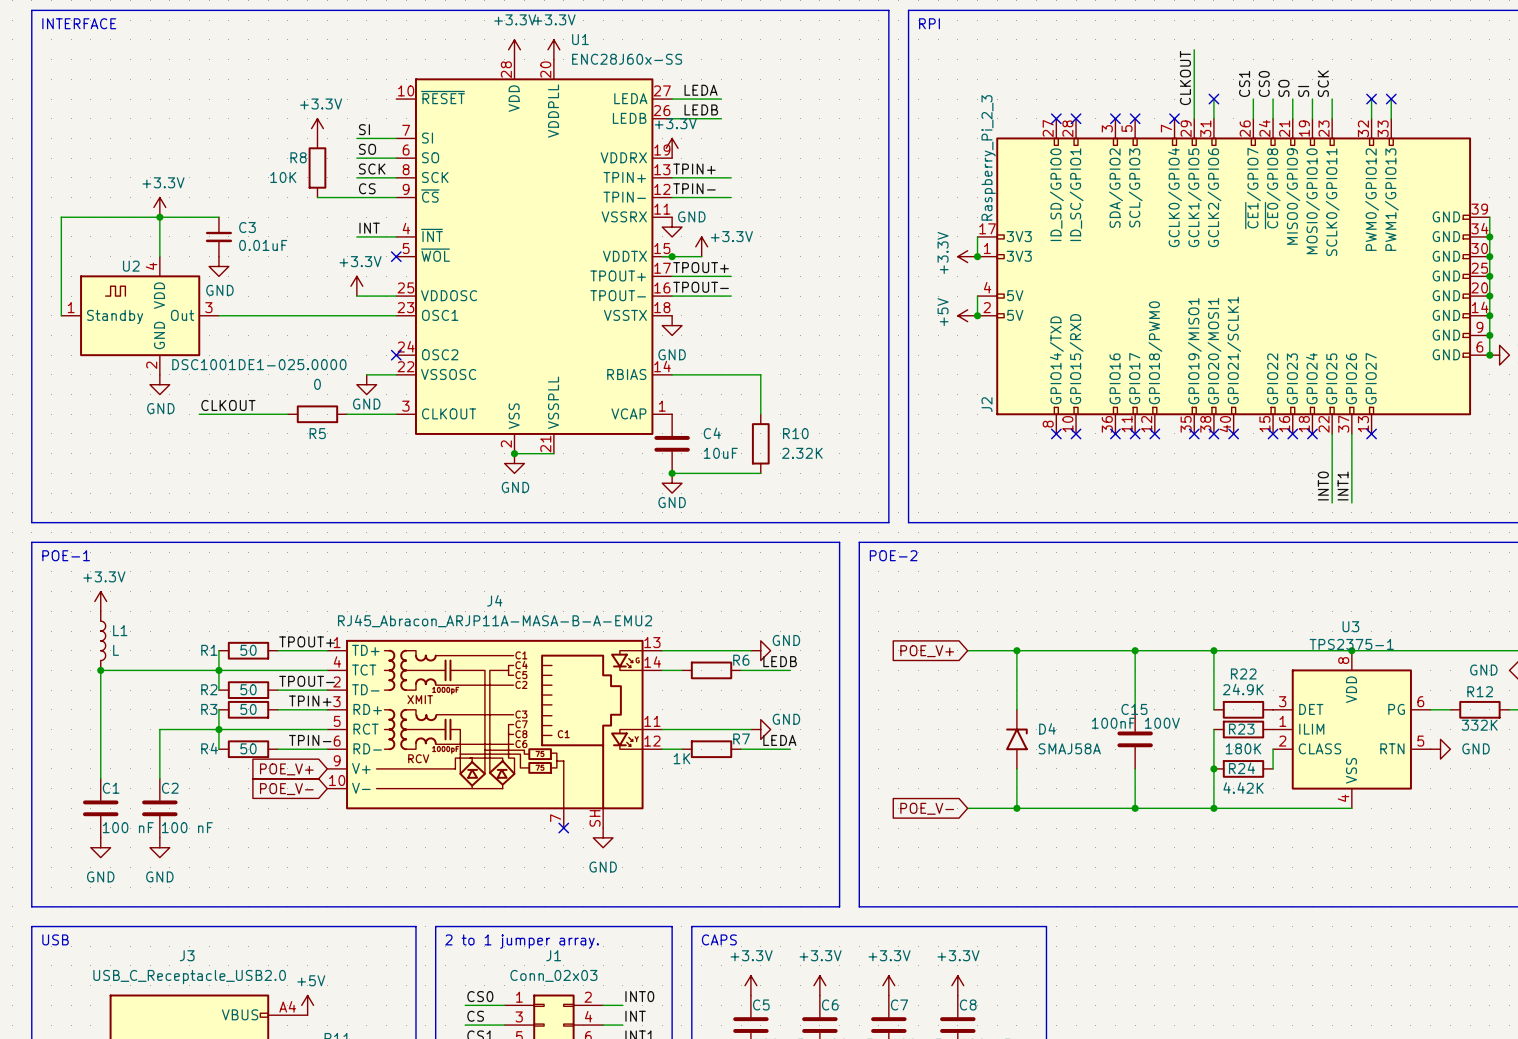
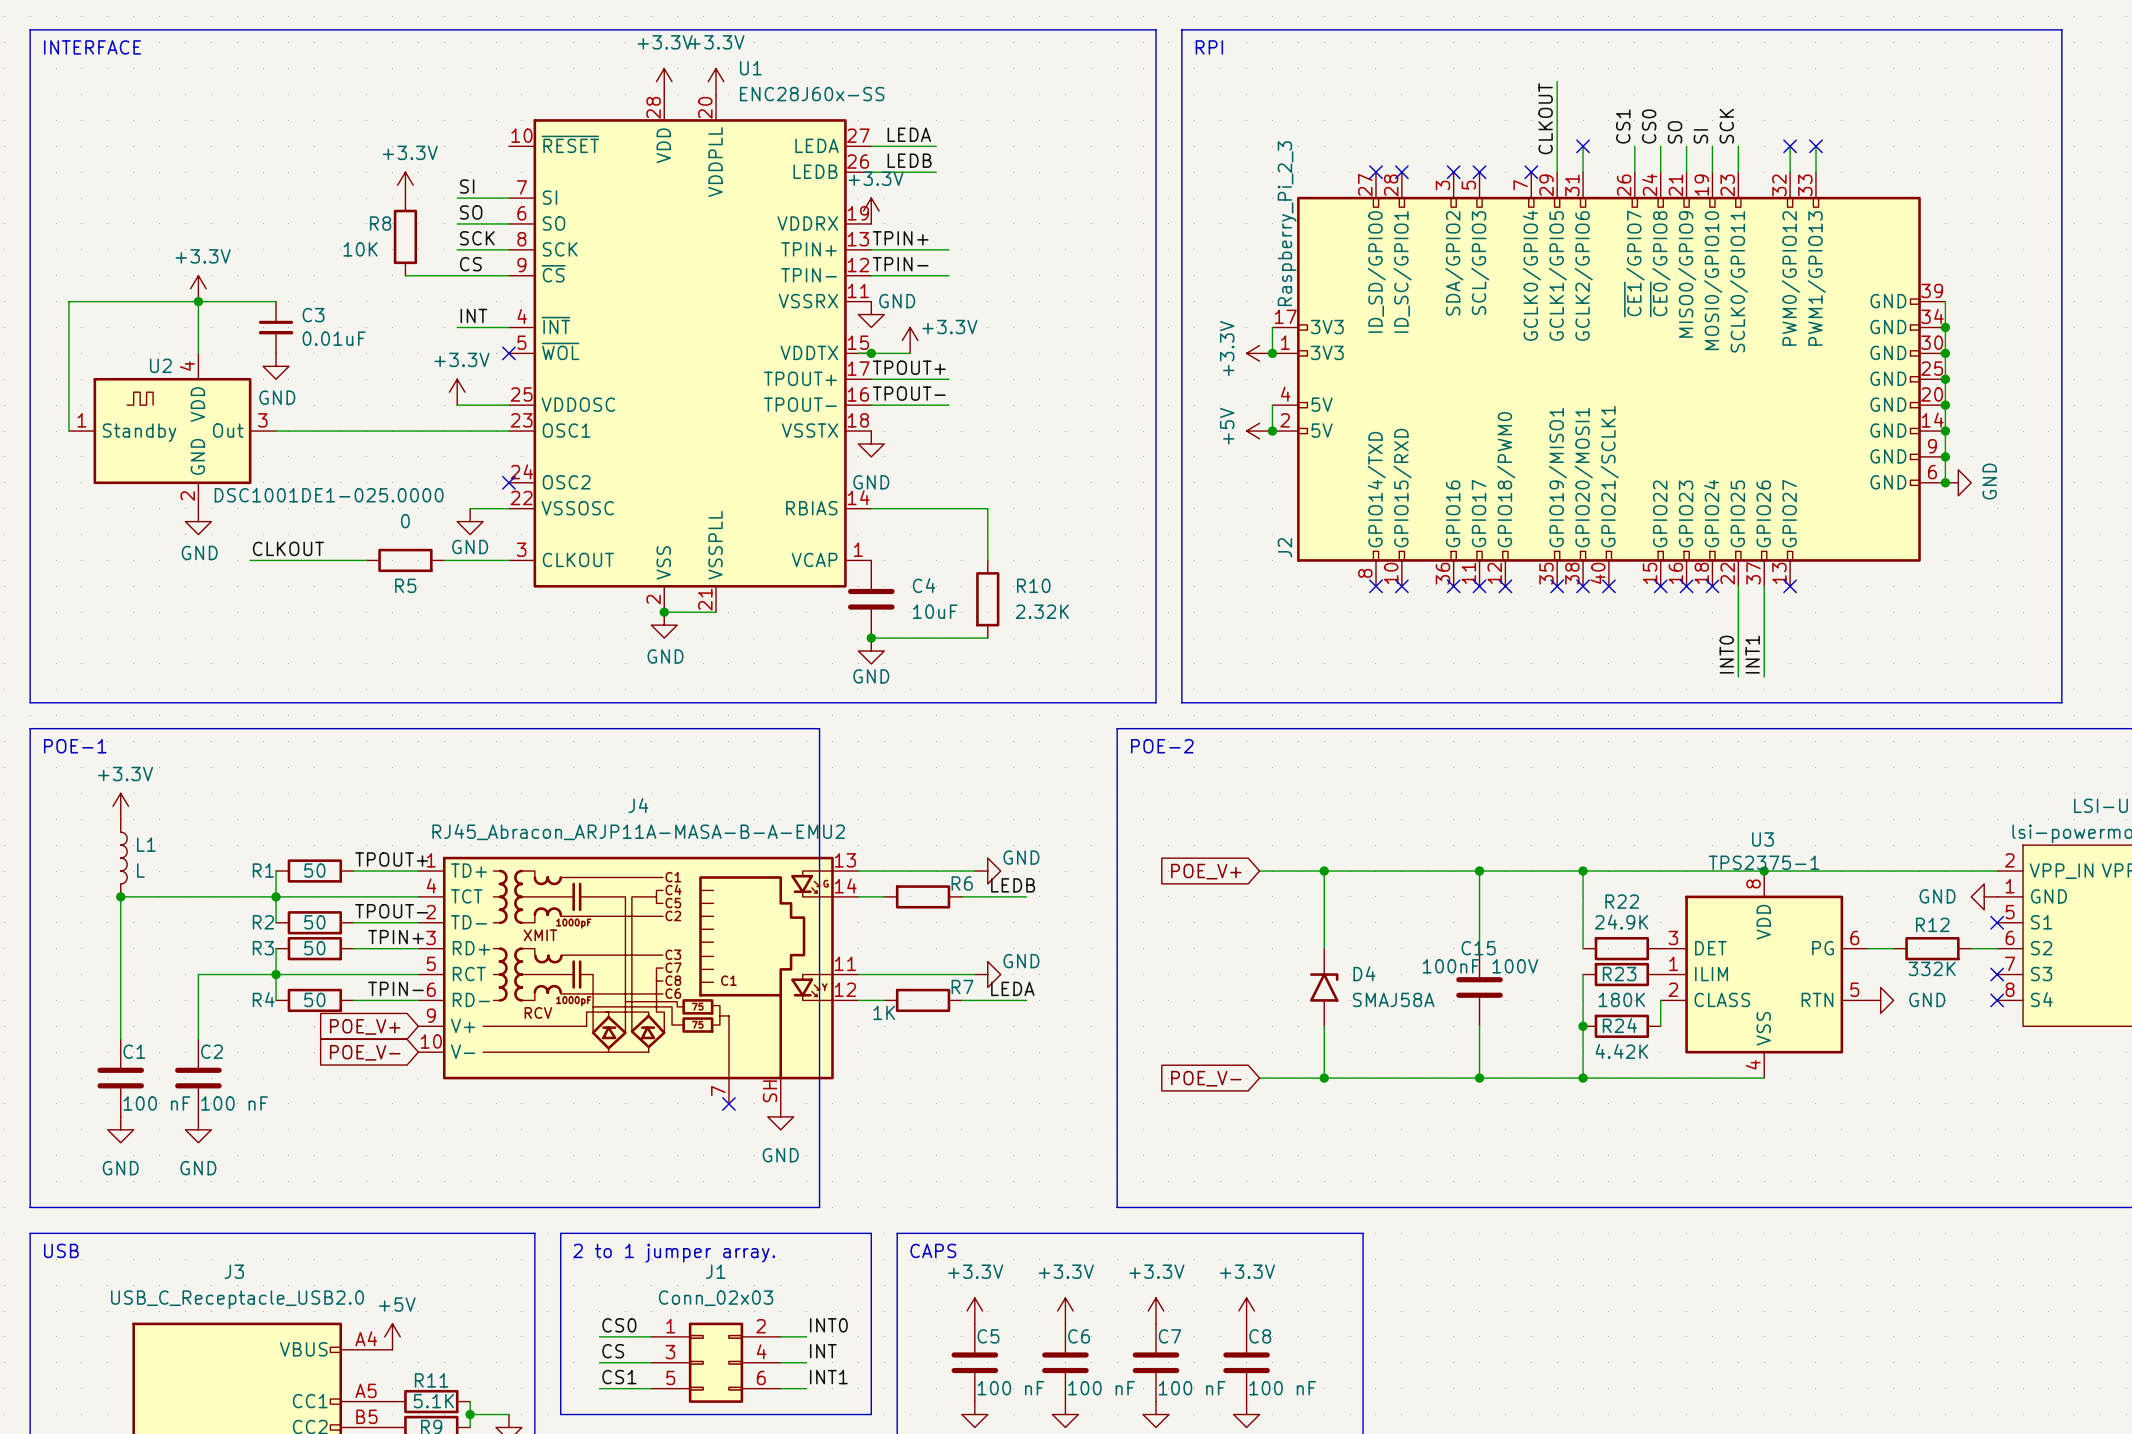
line: (632, 542) (839, 542) (839, 906) (632, 906) -> (819, 728) (819, 1207)

